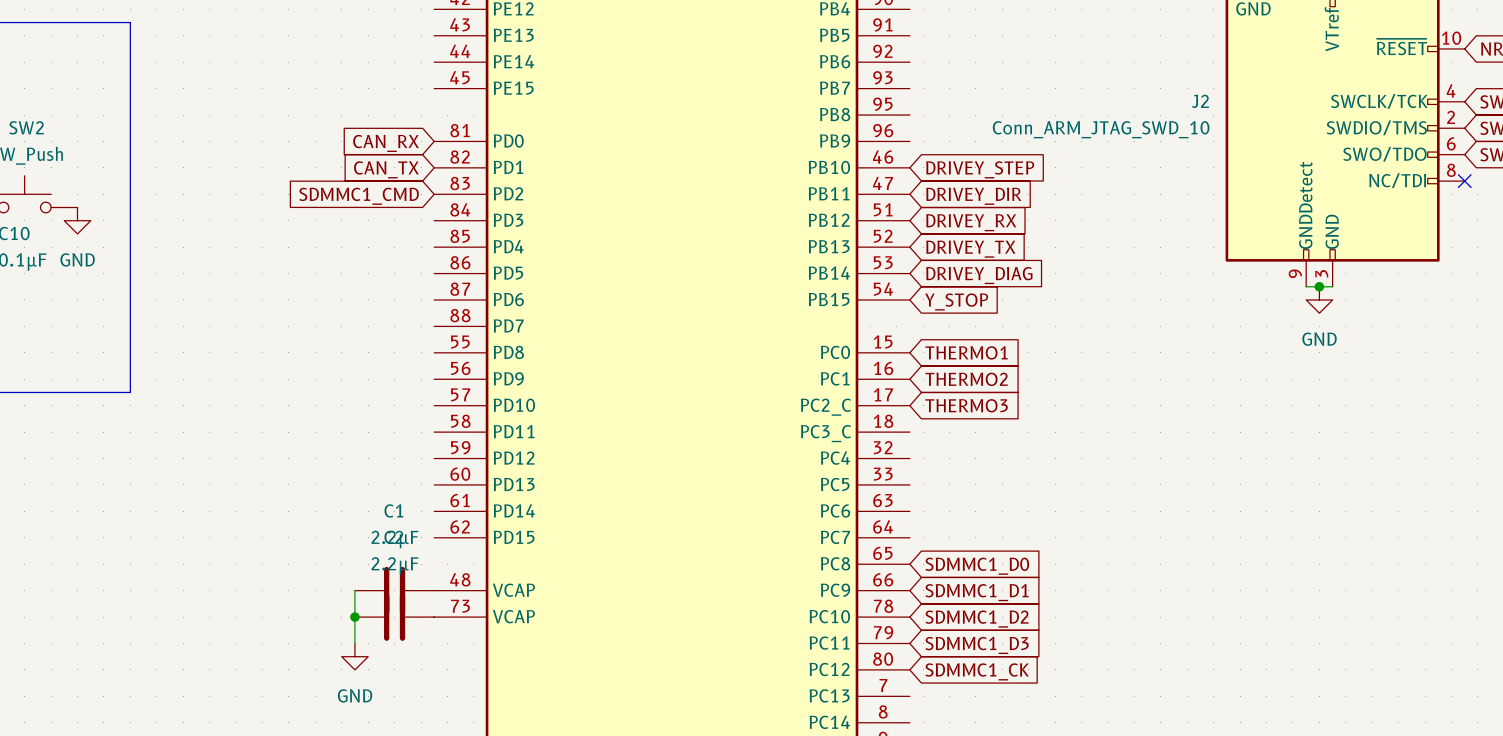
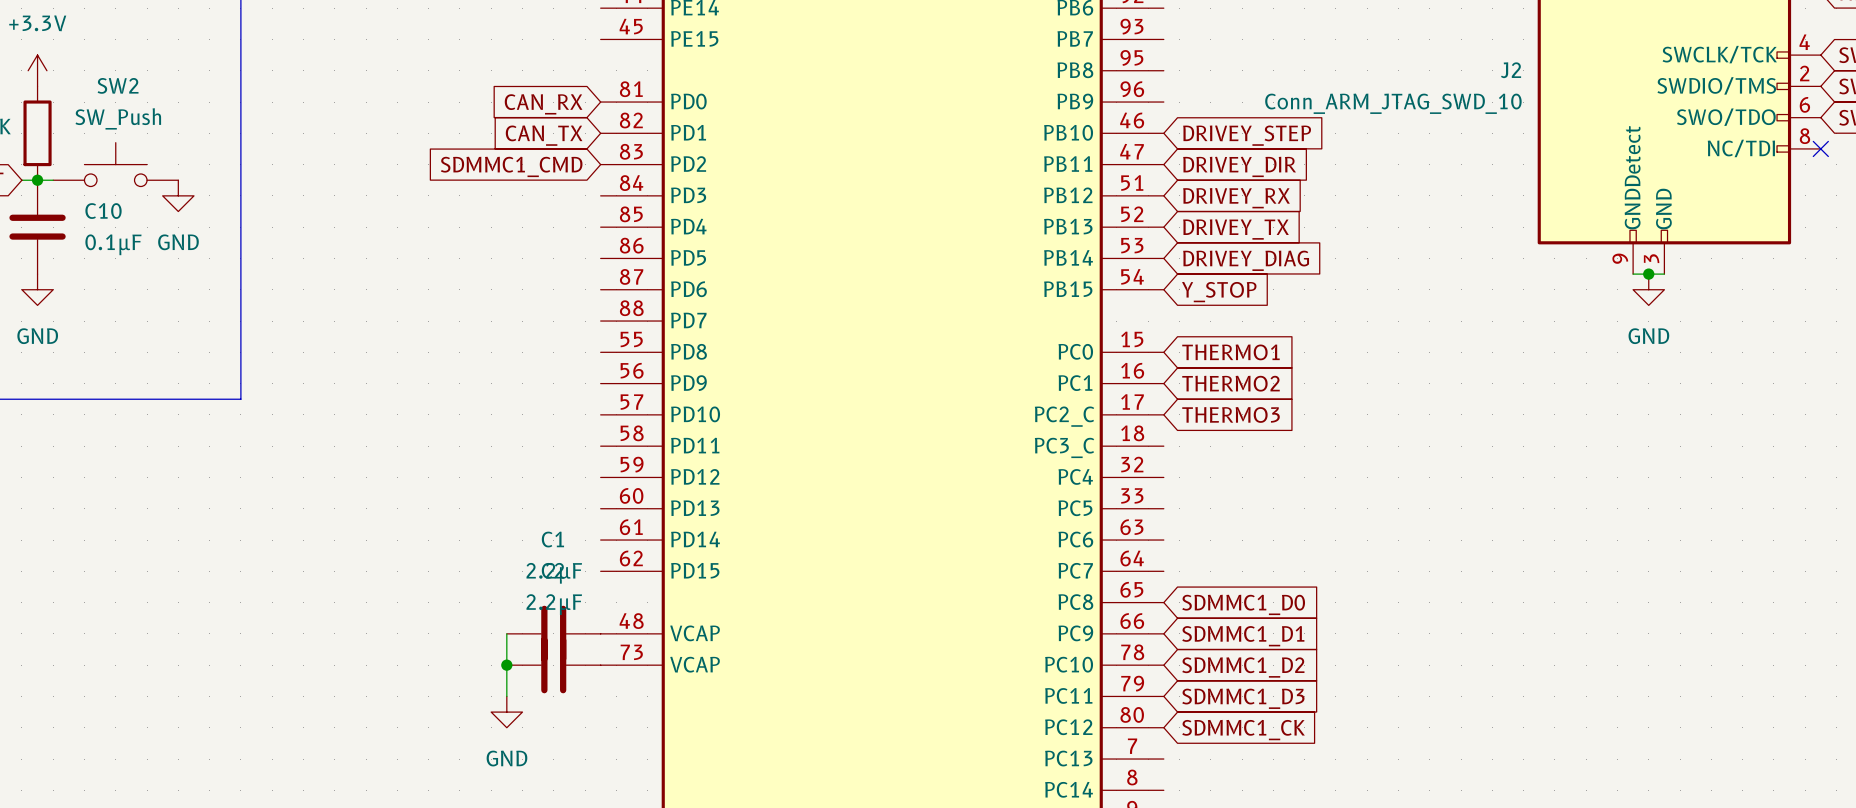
J2 name position: J2 (1200, 101) -> J2 (1511, 70)
J2 value position: Conn_ARM_JTAG_SWD_10 (1101, 129) -> Conn_ARM_JTAG_SWD_10 (1393, 103)

